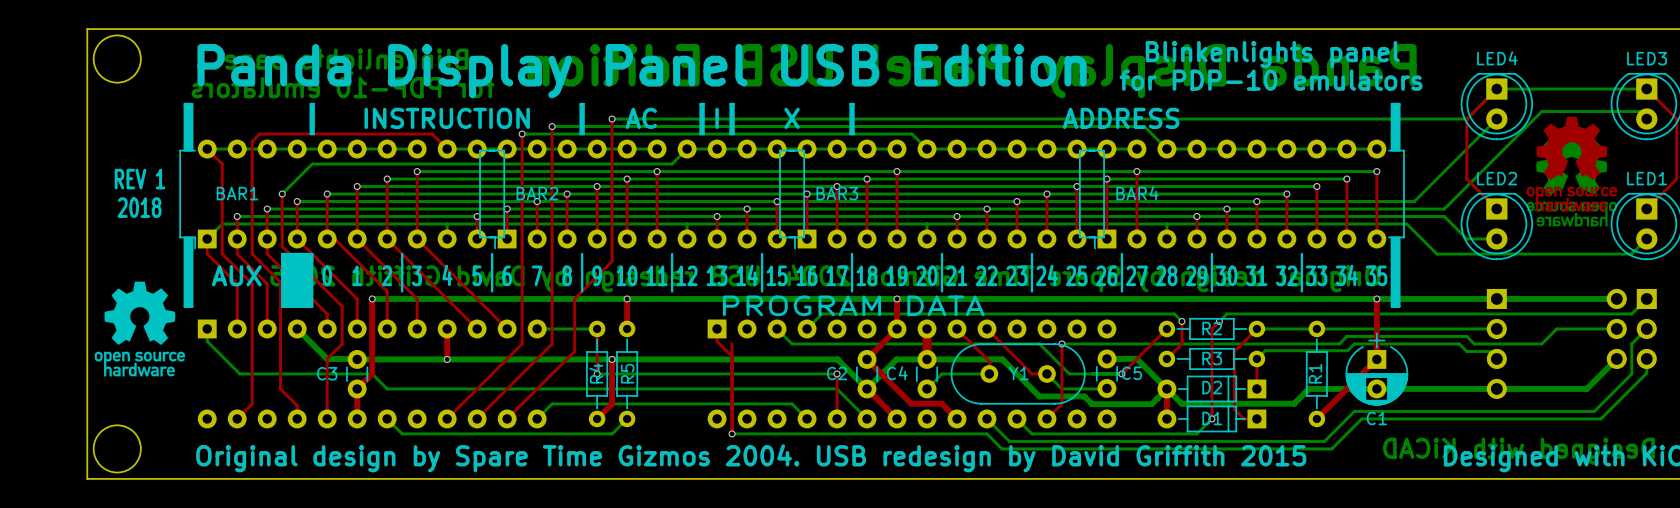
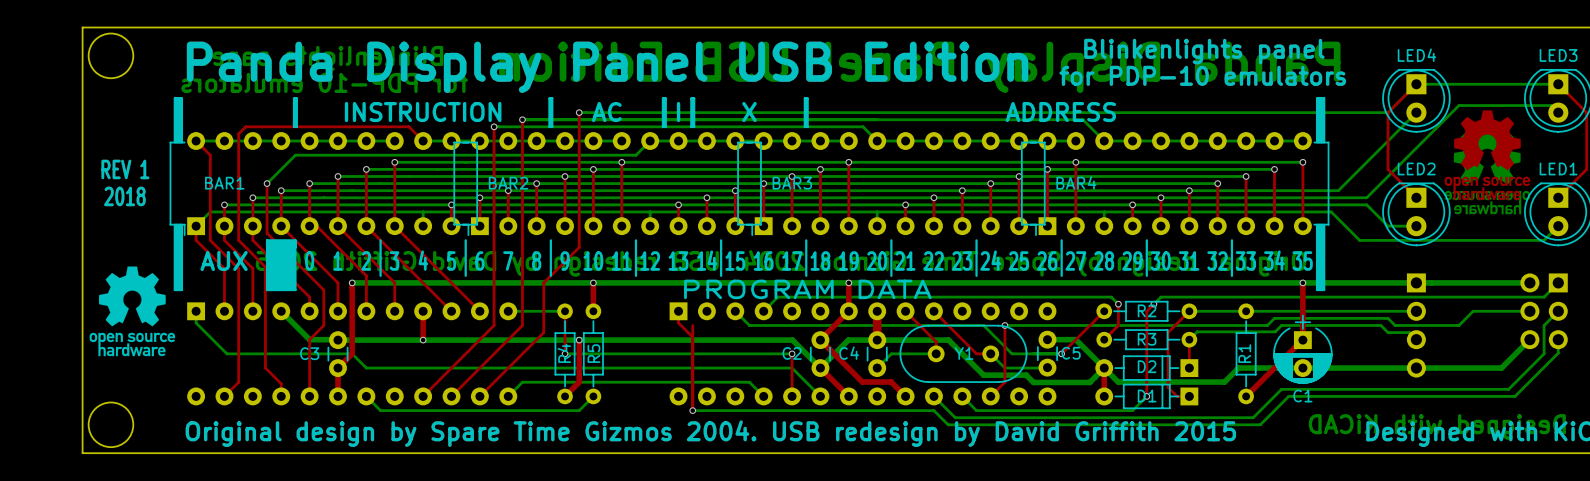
text: none -> REV 1 (125, 169)
text: REV 1 (140, 179) -> none
text: none -> 2018 (124, 196)
text: 2018 (139, 207) -> none

